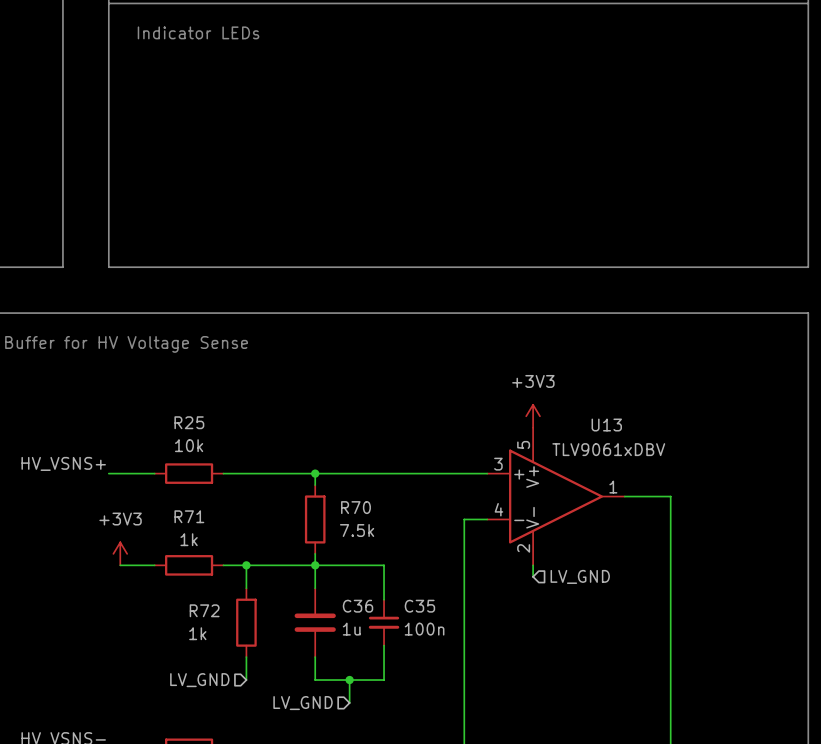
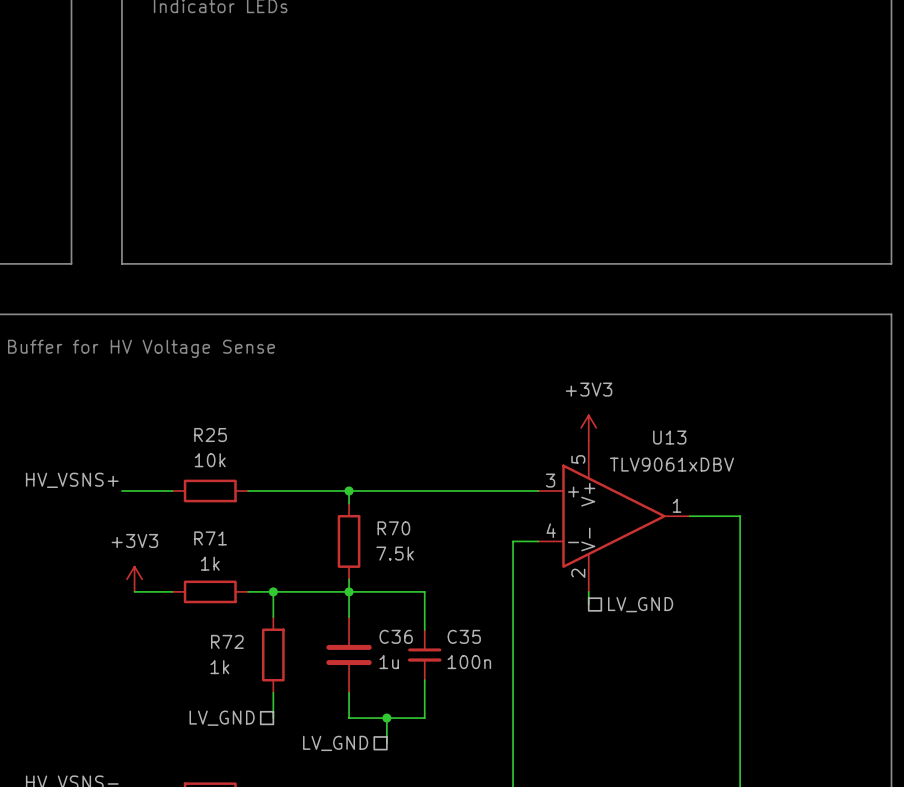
hierarchical label shape: input (580, 576) -> passive (640, 604)
hierarchical label shape: input (199, 680) -> passive (222, 718)
hierarchical label shape: input (303, 703) -> passive (335, 743)

